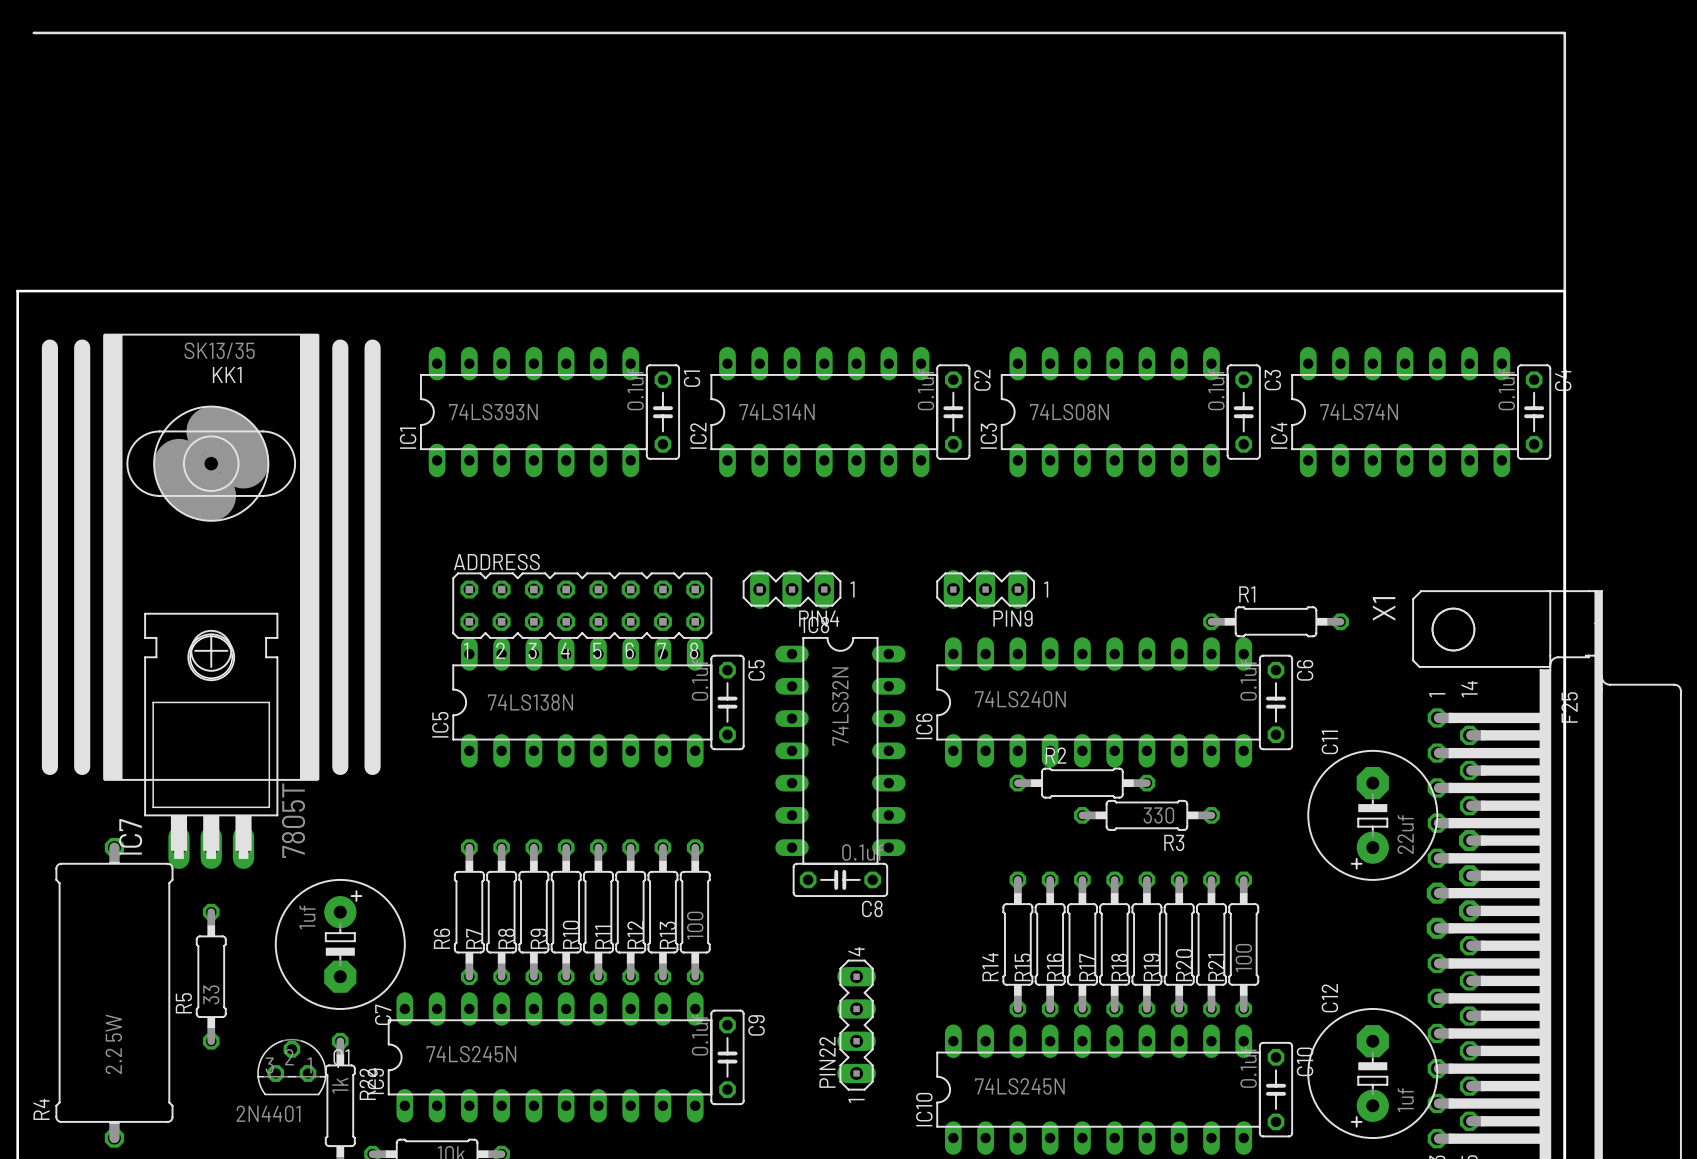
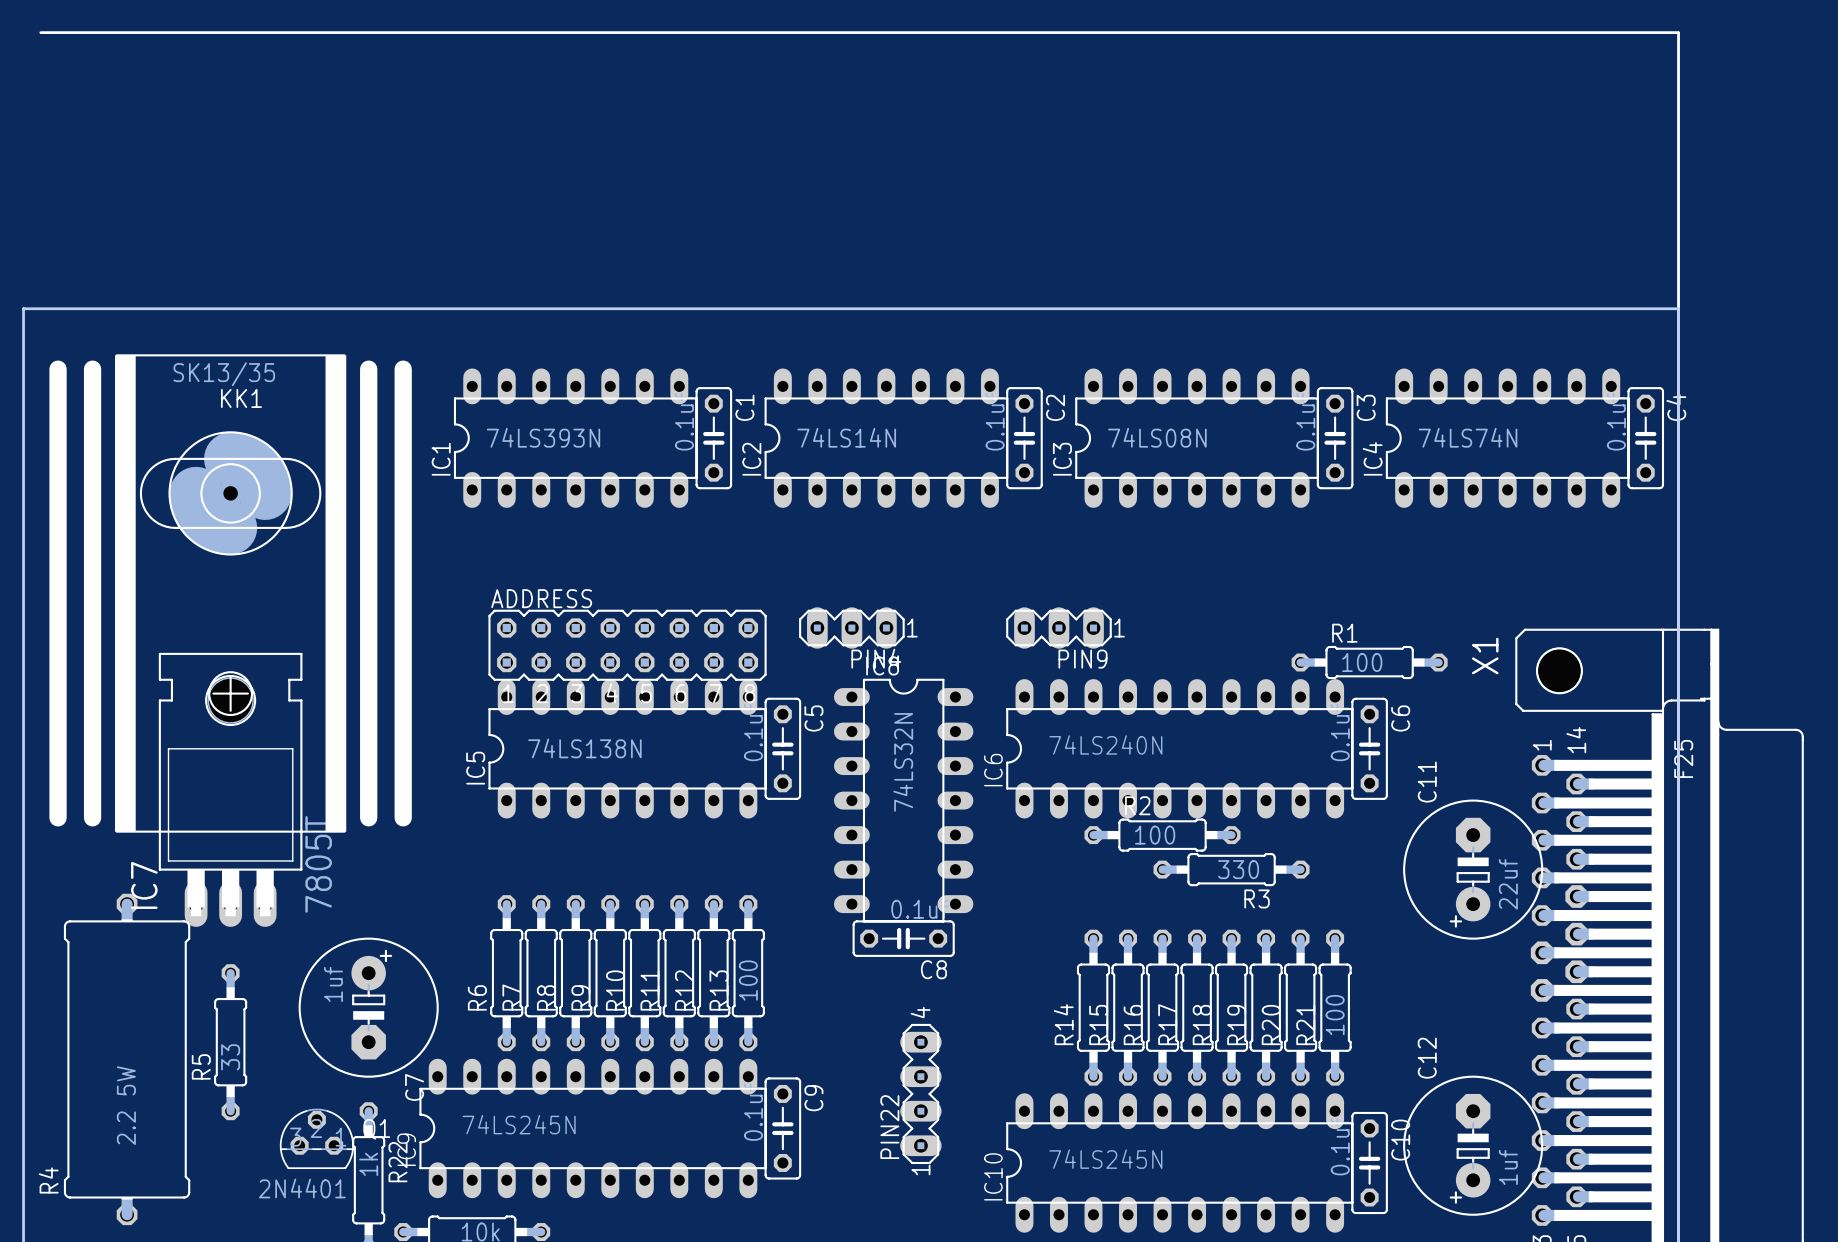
R1 value: none -> 100 (1362, 662)
R2 value: none -> 100 (1155, 835)

